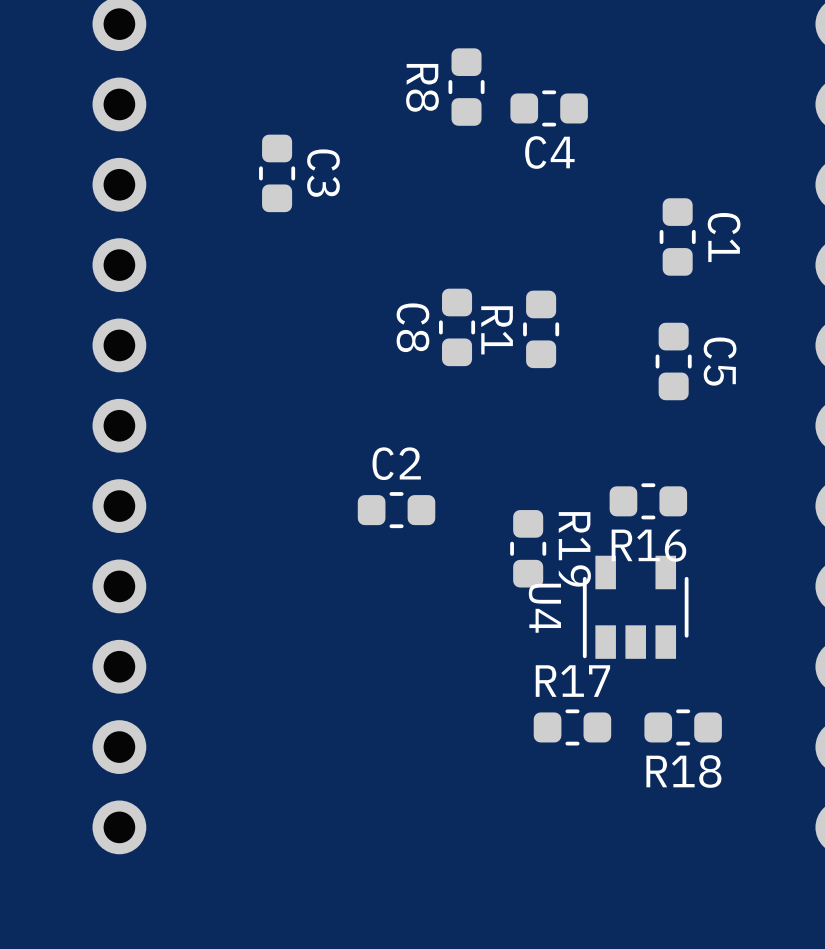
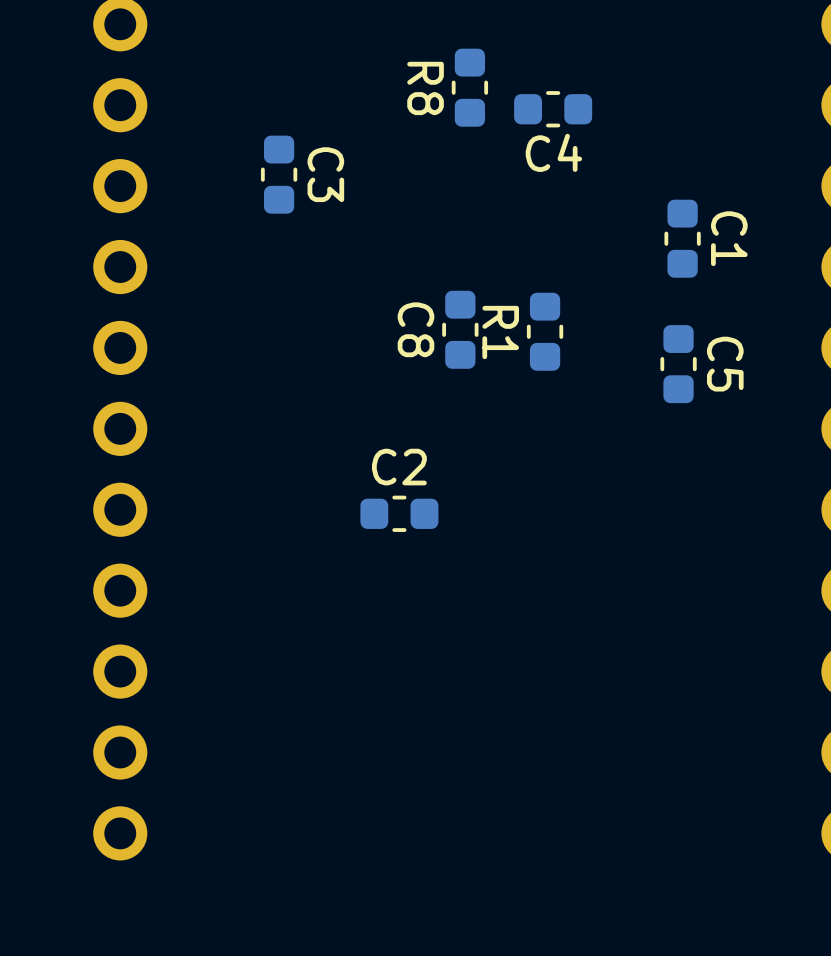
R16: (648, 501) -> none
R19: (528, 548) -> none
U4: (635, 607) -> none
R17: (572, 727) -> none
R18: (683, 727) -> none

